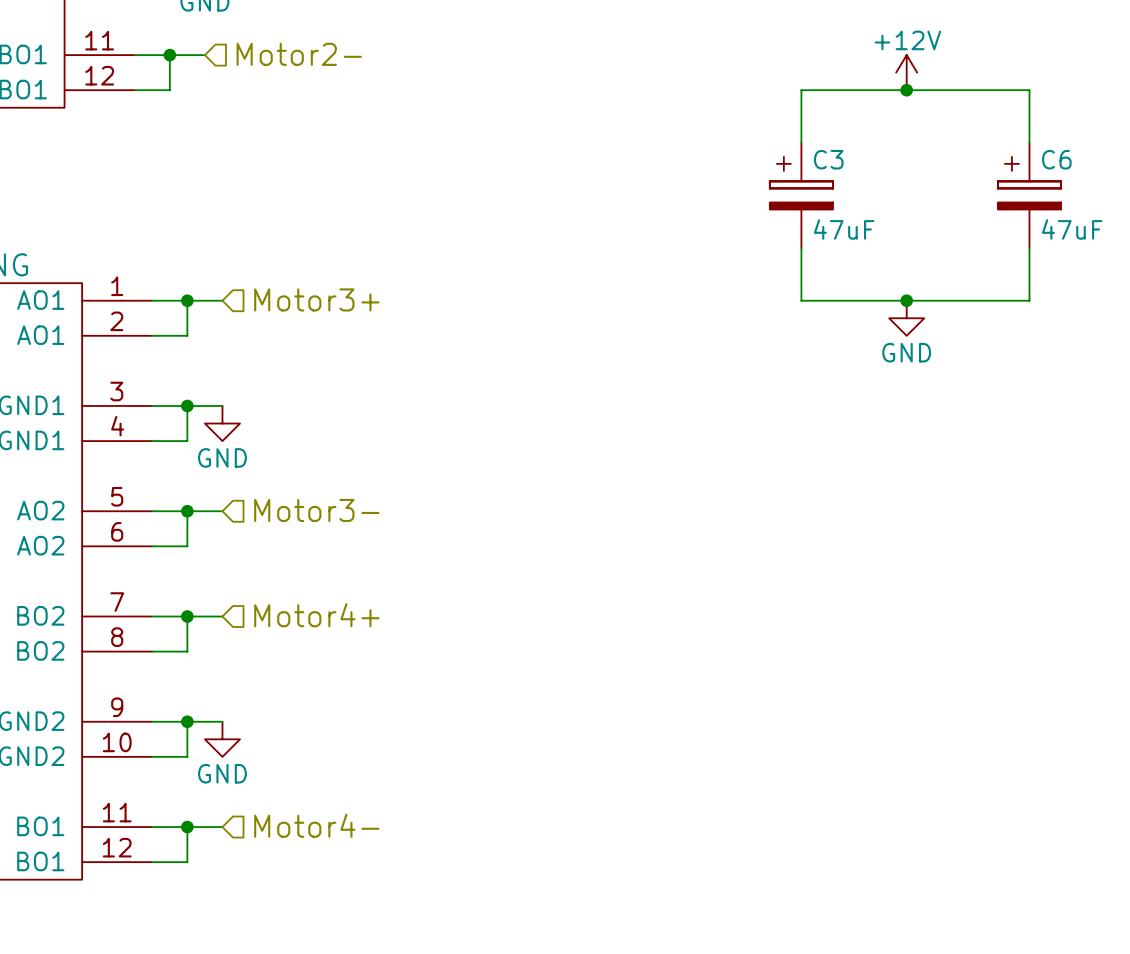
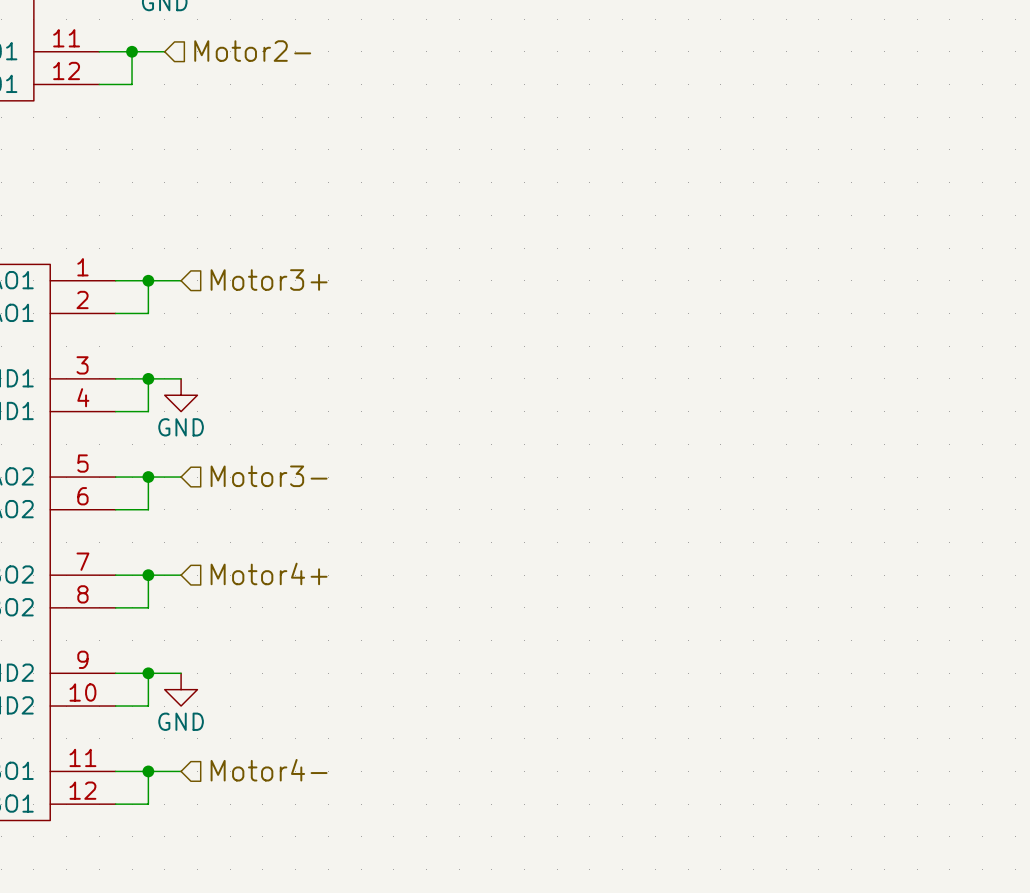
power symbol: +12V (906, 72) -> none
junction: (906, 90) -> none
wire: (801, 142) (801, 90) (1029, 90) (1029, 142) -> none
C3: 47uF (801, 195) -> none
C6: 47uF (1029, 195) -> none
wire: (801, 248) (801, 300) (1029, 300) (1029, 248) -> none
junction: (906, 300) -> none
power symbol: GND (906, 318) -> none

